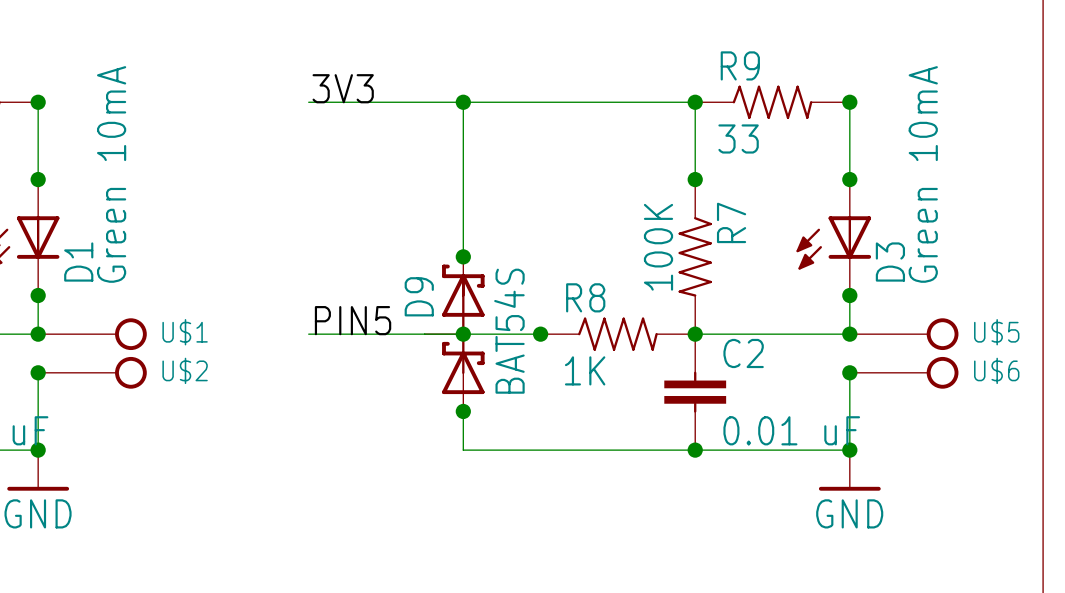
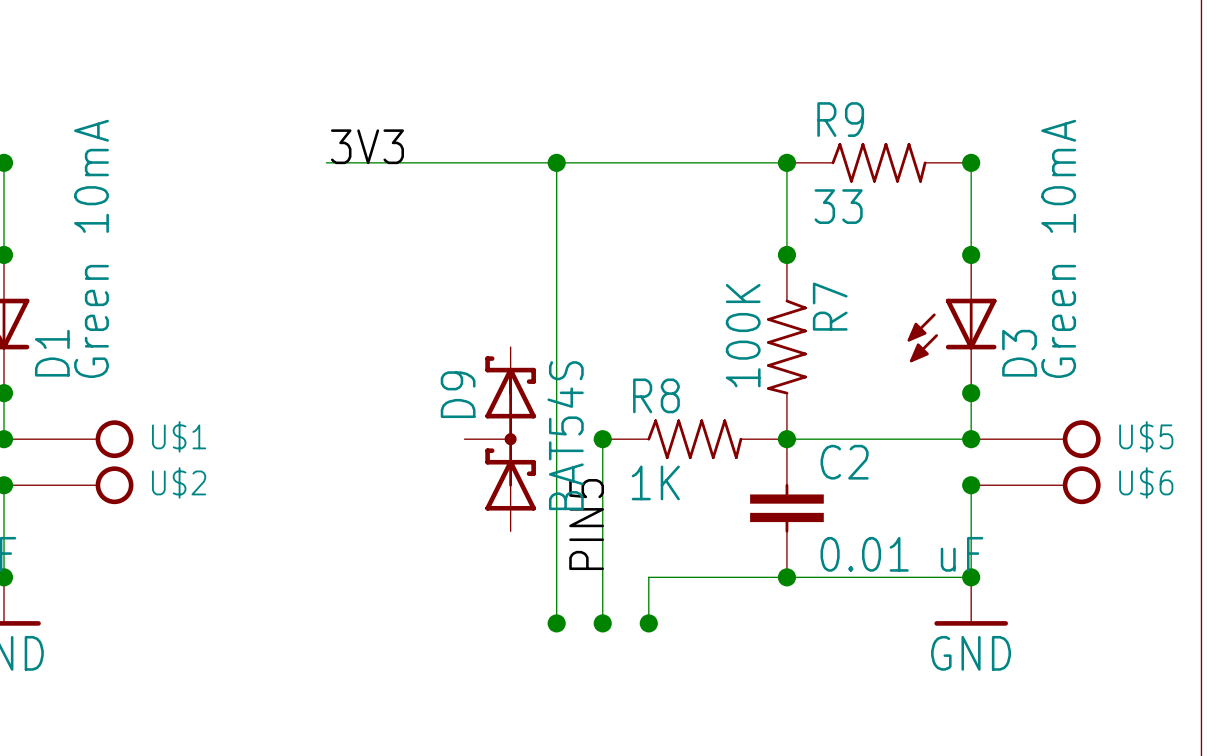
wire: (463, 102) (463, 256) -> none
junction position: (463, 102) -> (556, 162)
wire: none -> (556, 162) (556, 623)
junction: (463, 256) -> none
label rotation: 0° (353, 320) -> 90° counterclockwise (586, 524)
label position: PIN5 (353, 320) -> PIN5 (586, 524)
wire: (308, 334) (540, 334) -> (602, 623) (602, 439)
junction: (463, 334) -> none
wire: (463, 411) (463, 450) (579, 450) -> (648, 623) (648, 577)
junction: (463, 411) -> none
junction: none -> (556, 623)
junction: none -> (602, 623)
junction: none -> (648, 623)

